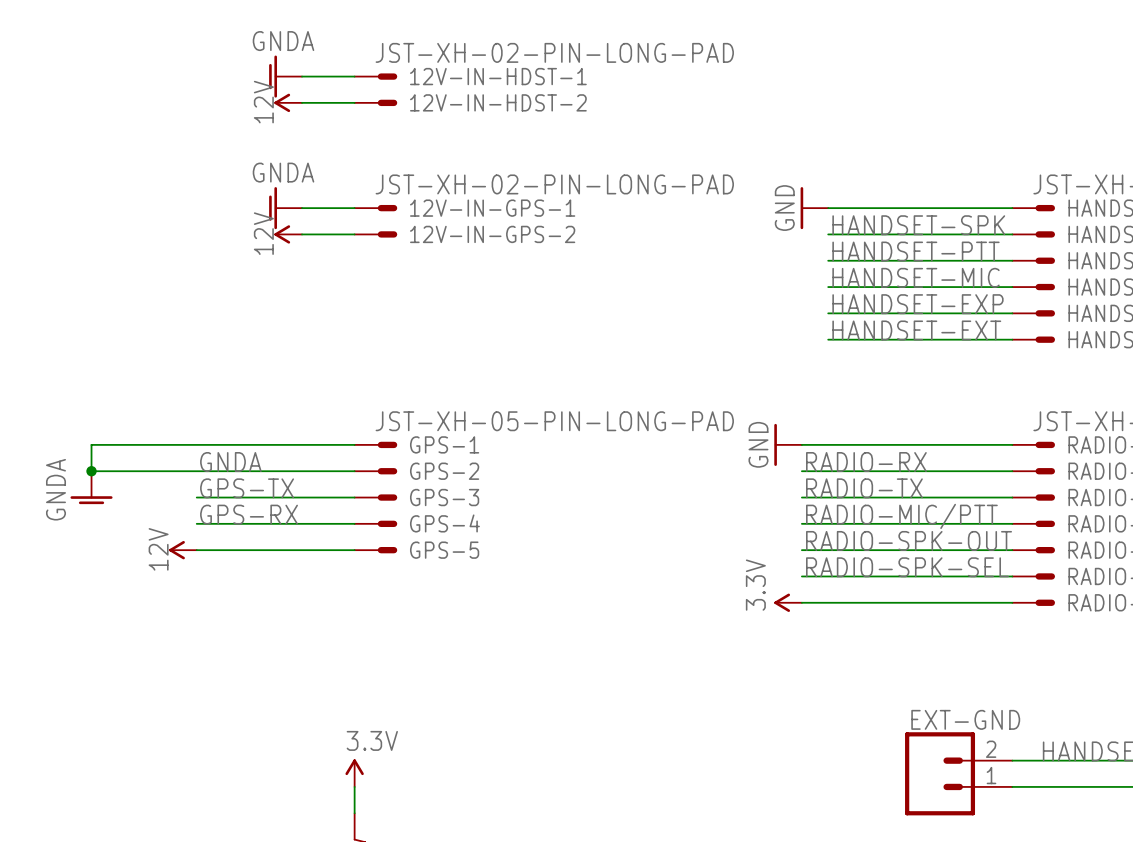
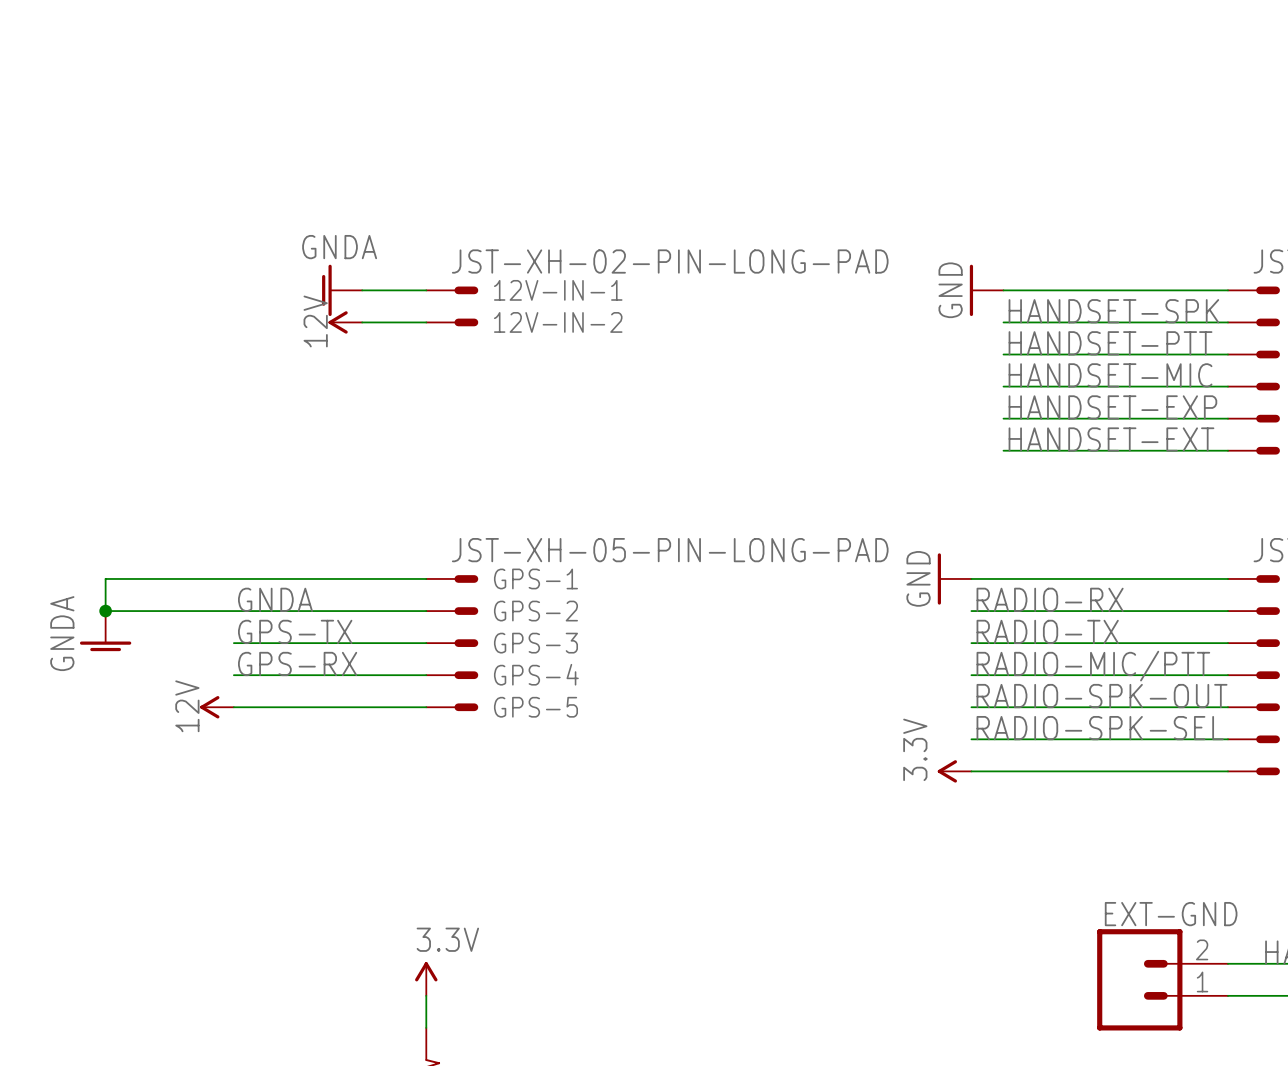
power symbol: GNDA (285, 76) -> none
wire: (302, 76) (354, 76) -> none
12V-IN-HDST-1: JST-XH-02-PIN-LONG-PAD (375, 76) -> none
power symbol: 12V (288, 102) -> none
wire: (302, 102) (354, 102) -> none
12V-IN-HDST-2: (375, 102) -> none
12V-IN-GPS-1 name: 12V-IN-GPS-1 (492, 208) -> 12V-IN-1 (558, 290)
12V-IN-GPS-2 name: 12V-IN-GPS-2 (492, 234) -> 12V-IN-2 (558, 322)

